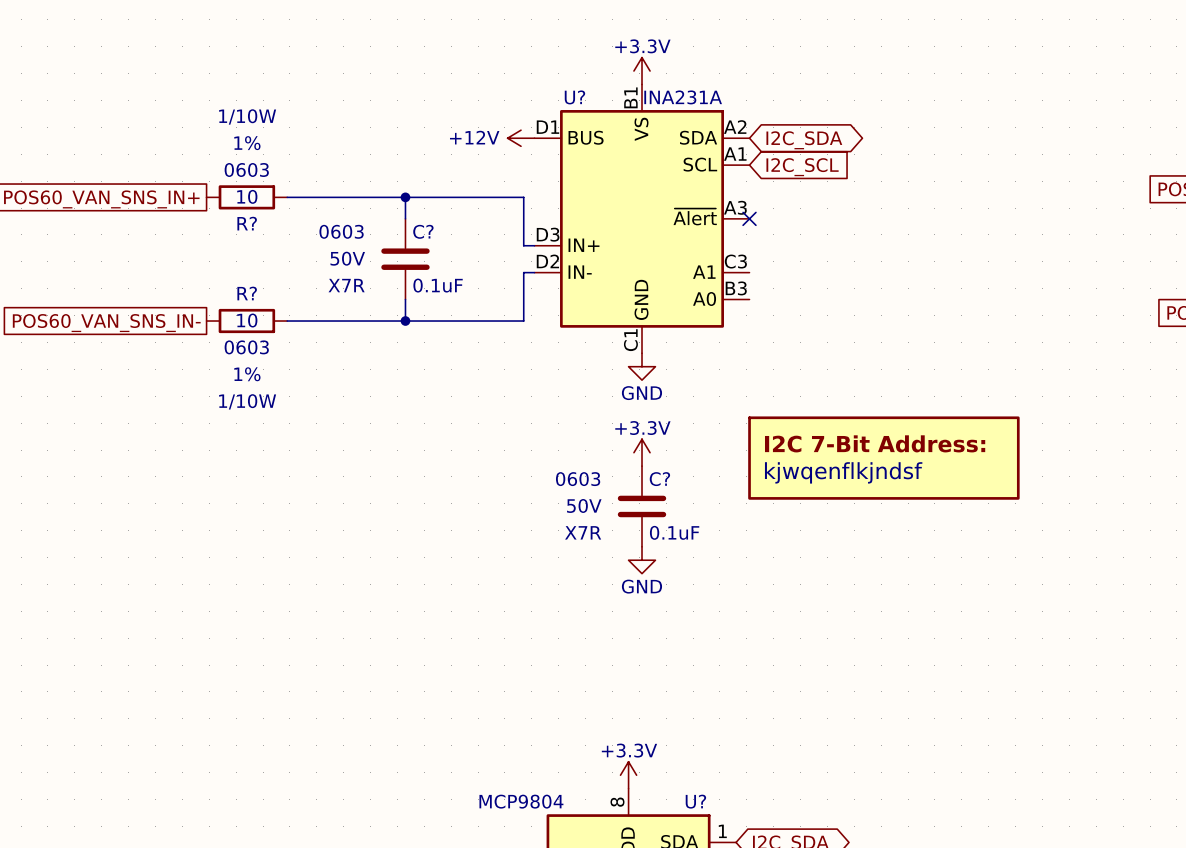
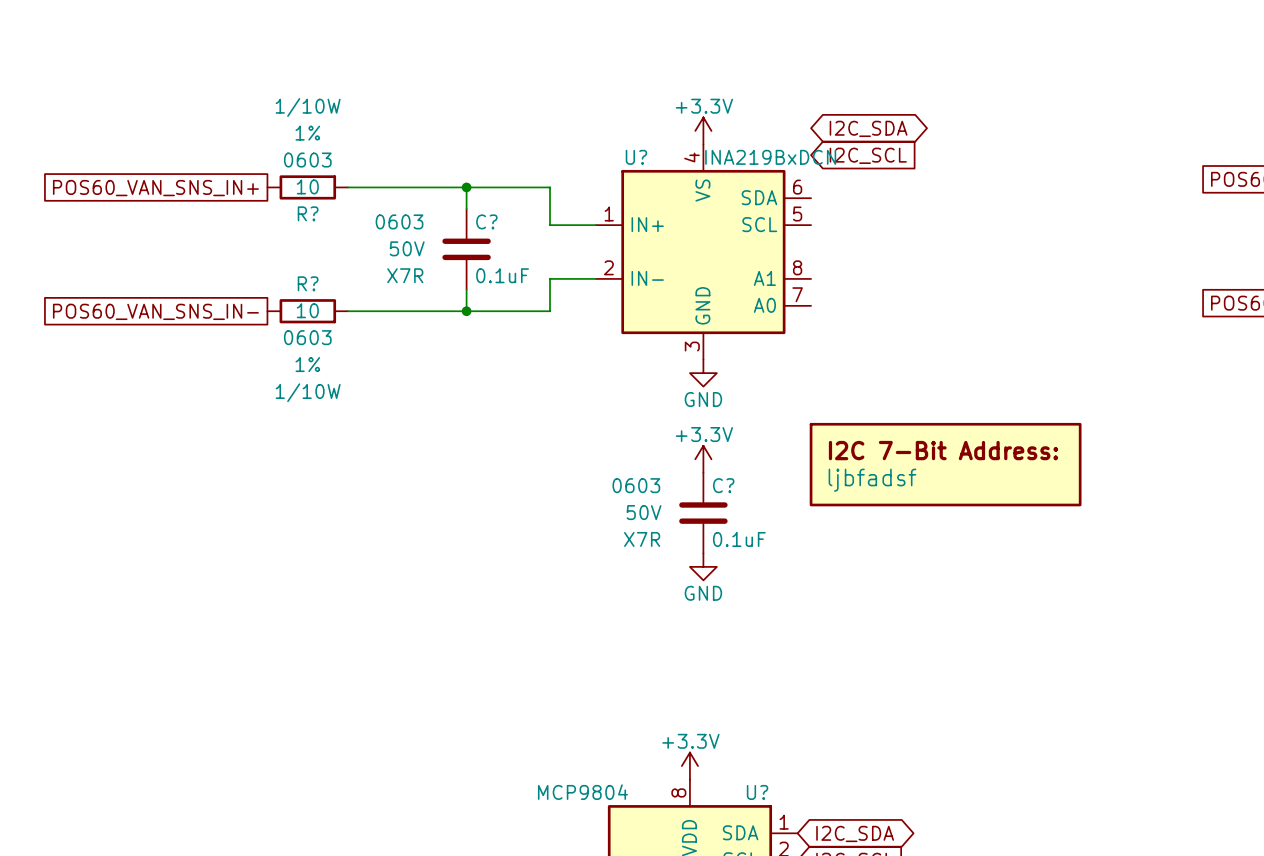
power symbol position: +3.3V (642, 71) -> +3.3V (703, 130)
power symbol: +12V (521, 138) -> none
wire: (488, 197) (523, 197) (523, 245) (534, 245) -> (550, 187) (550, 225) (595, 225)
U?: INA231A (642, 218) -> none
no-connect mark: (749, 218) -> none
U?: none -> INA219BxDCN (703, 252)
wire: (534, 272) (523, 272) (523, 321) (488, 321) -> (595, 278) (550, 278) (550, 311)
power symbol position: GND (642, 366) -> GND (703, 373)
power symbol position: +3.3V (642, 452) -> +3.3V (703, 459)
part: kjwqenflkjndsf (883, 458) -> none
part: none -> ljbfadsf (945, 464)
C? position: (642, 506) -> (703, 513)
power symbol position: GND (642, 560) -> GND (703, 566)

